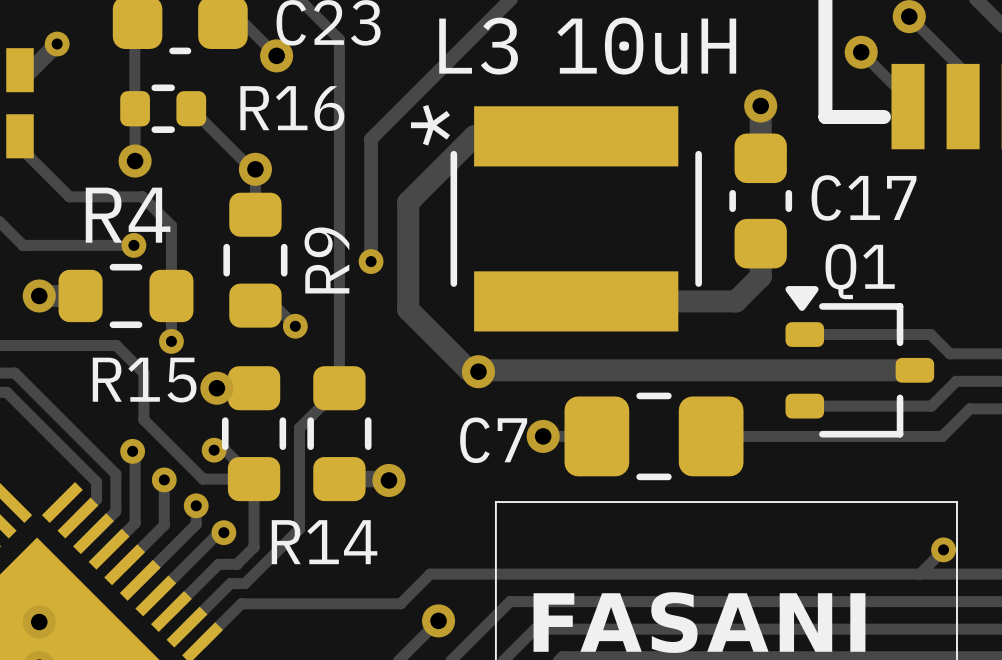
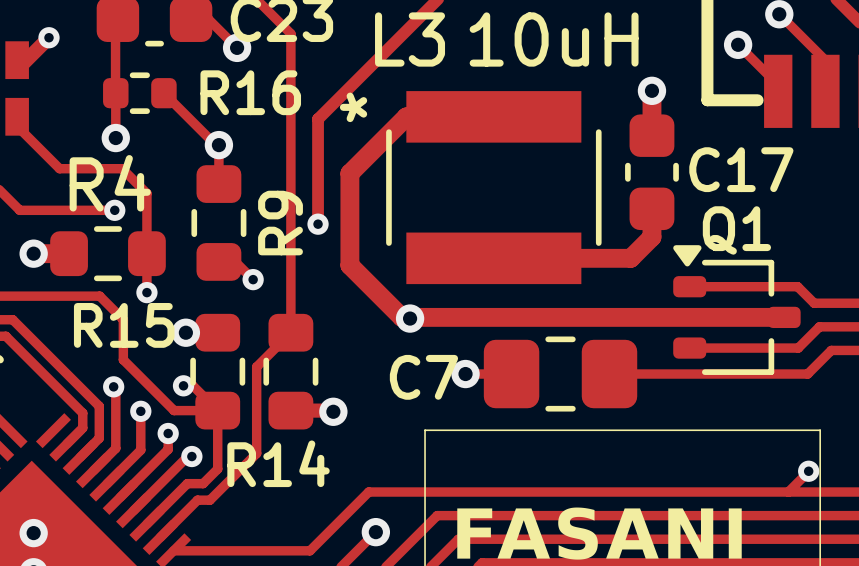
track: (400, 603) (241, 603) (202, 642) -> (343, 517) (309, 550) (173, 550)

